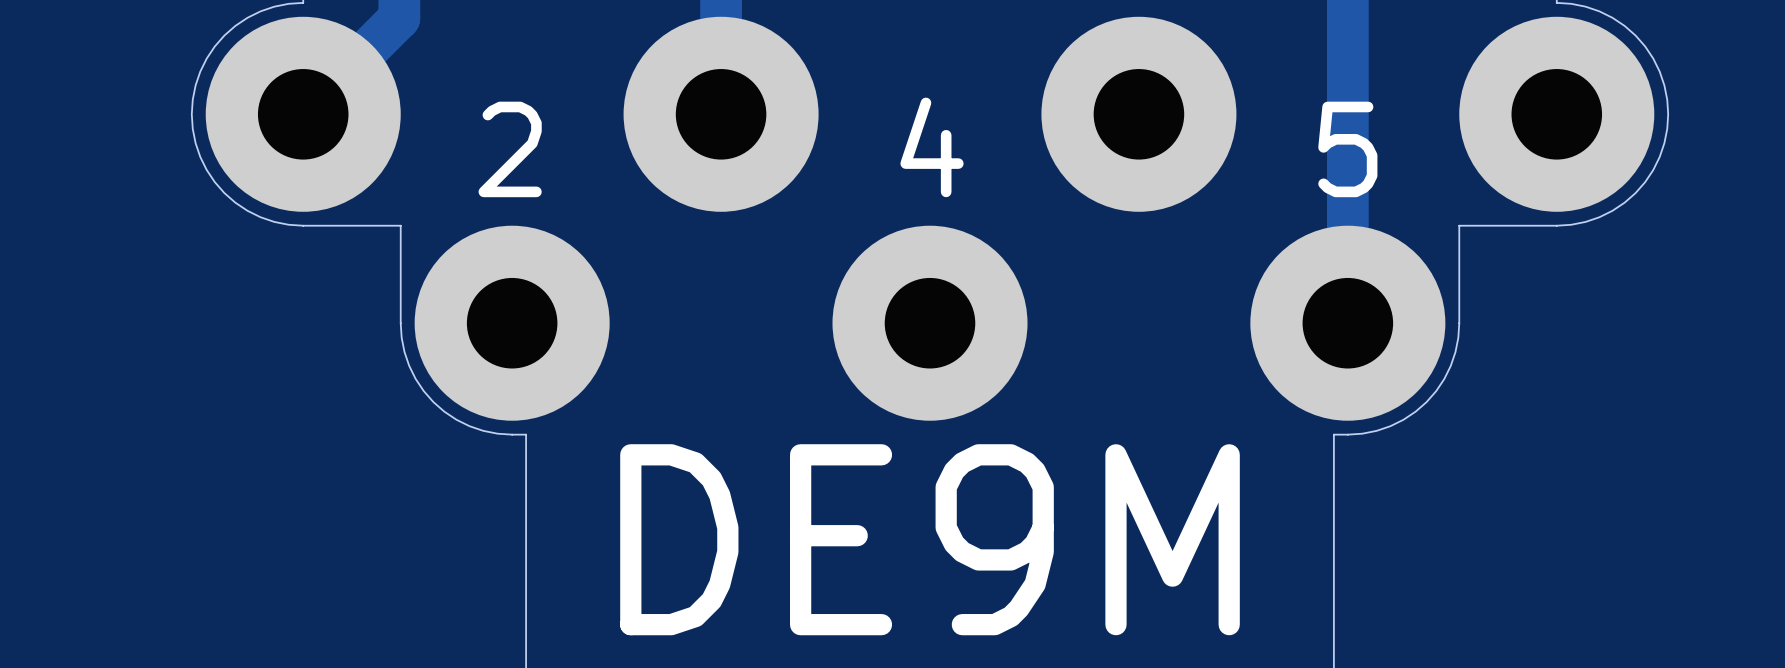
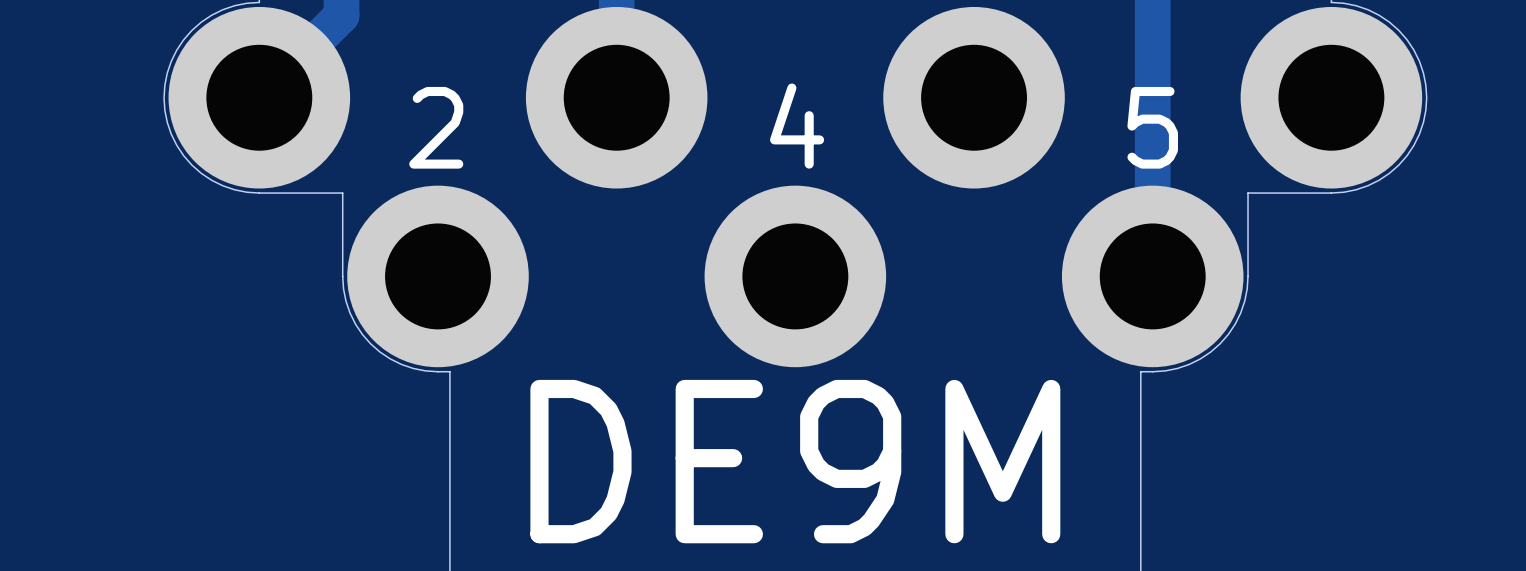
part footprint: [205, 16, 1655, 421] -> [168, 6, 1423, 368]

